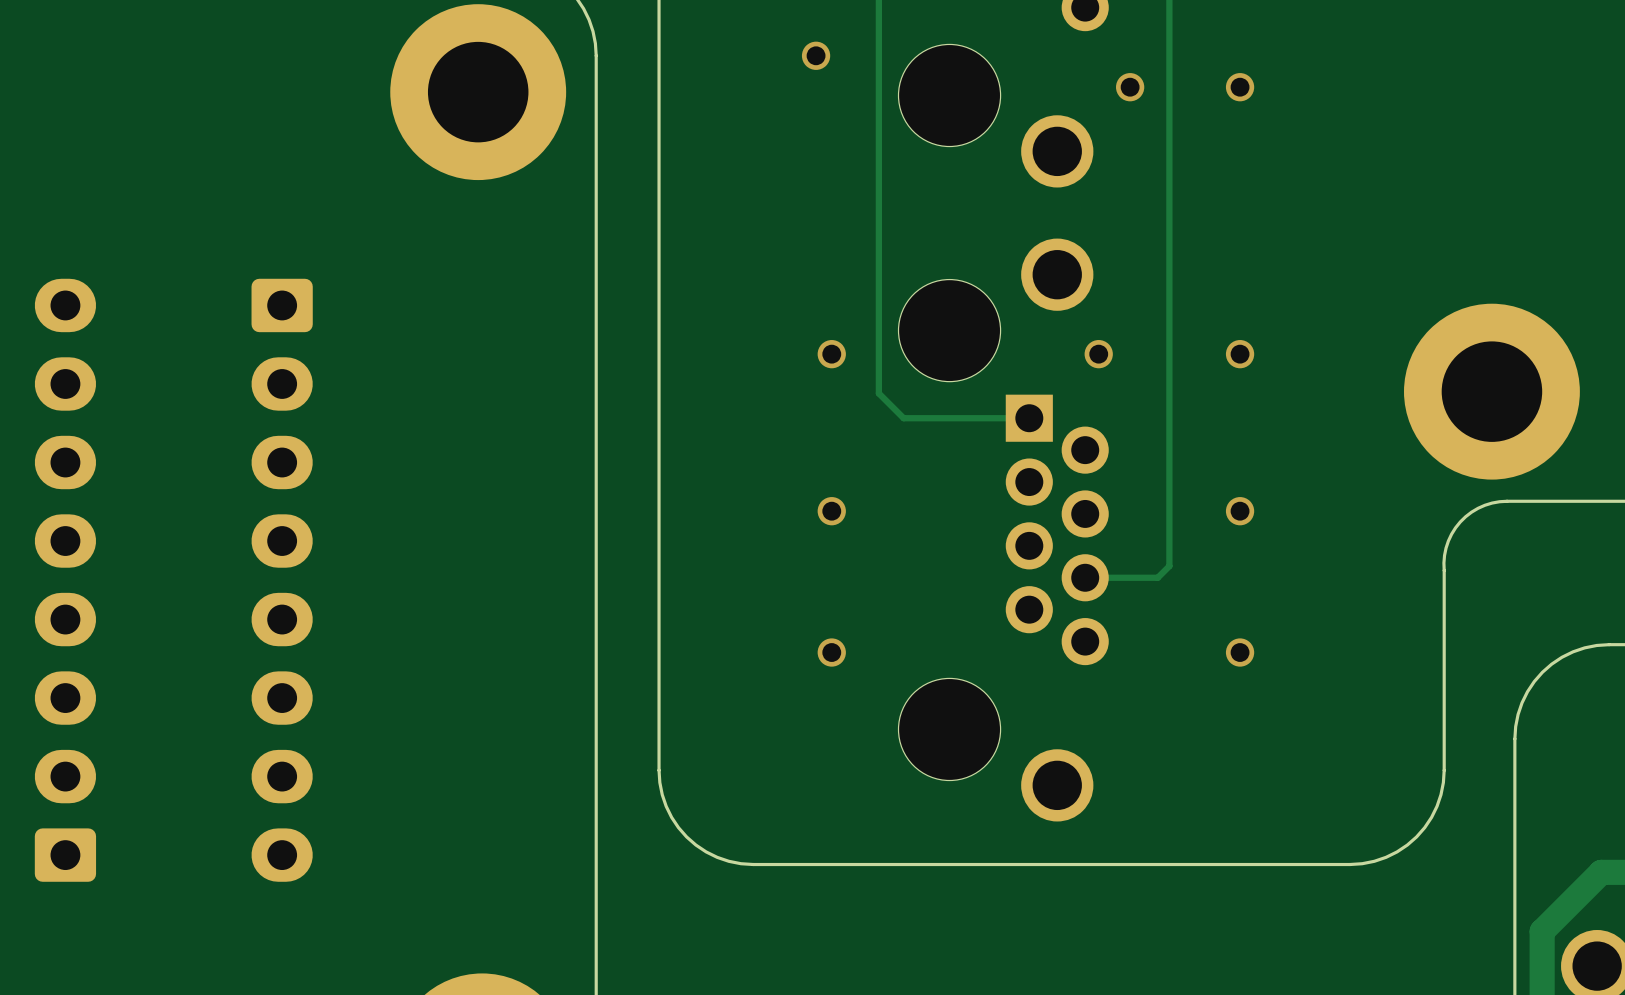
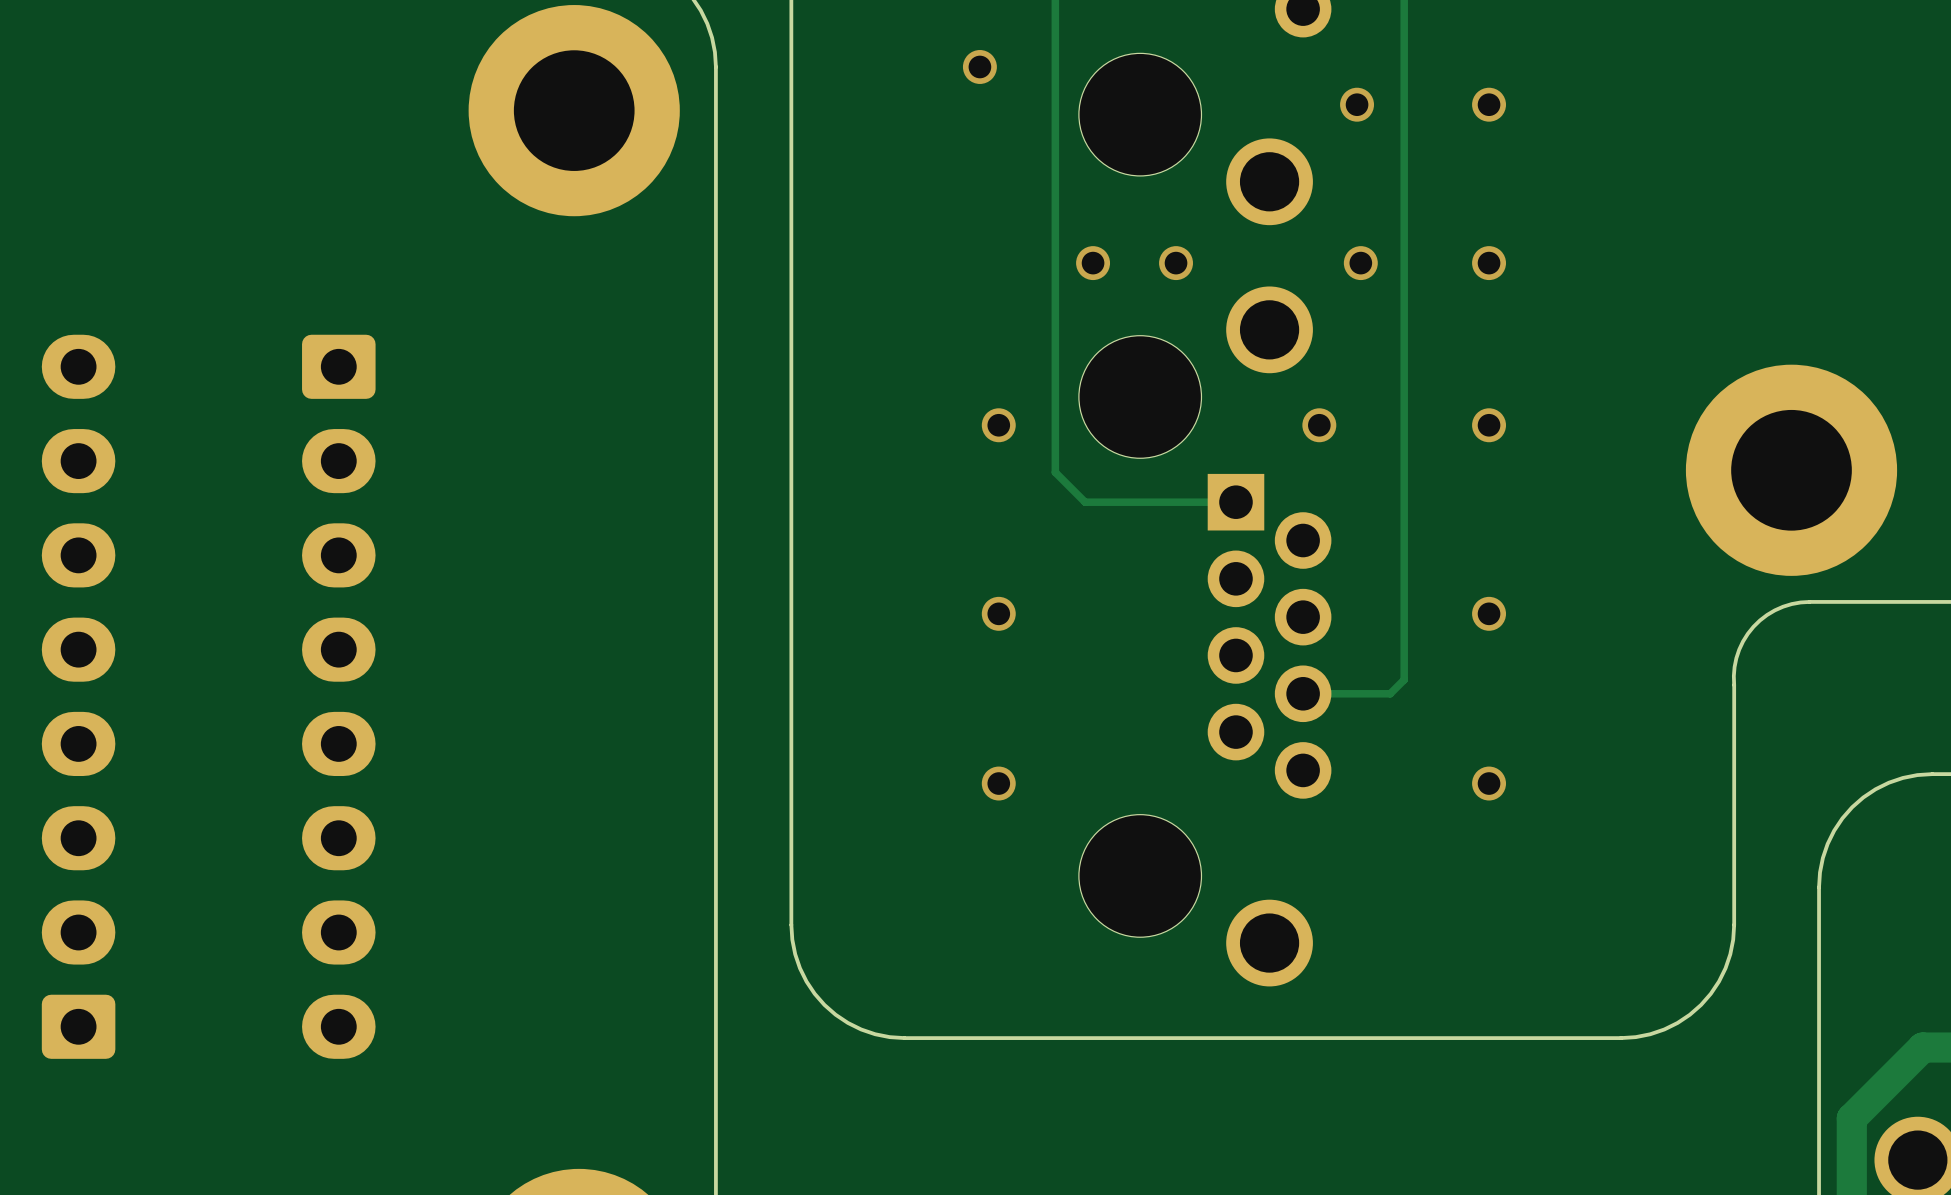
via: none -> (1093, 263)
via: none -> (1176, 263)
via: none -> (1360, 263)
via: none -> (1489, 263)

